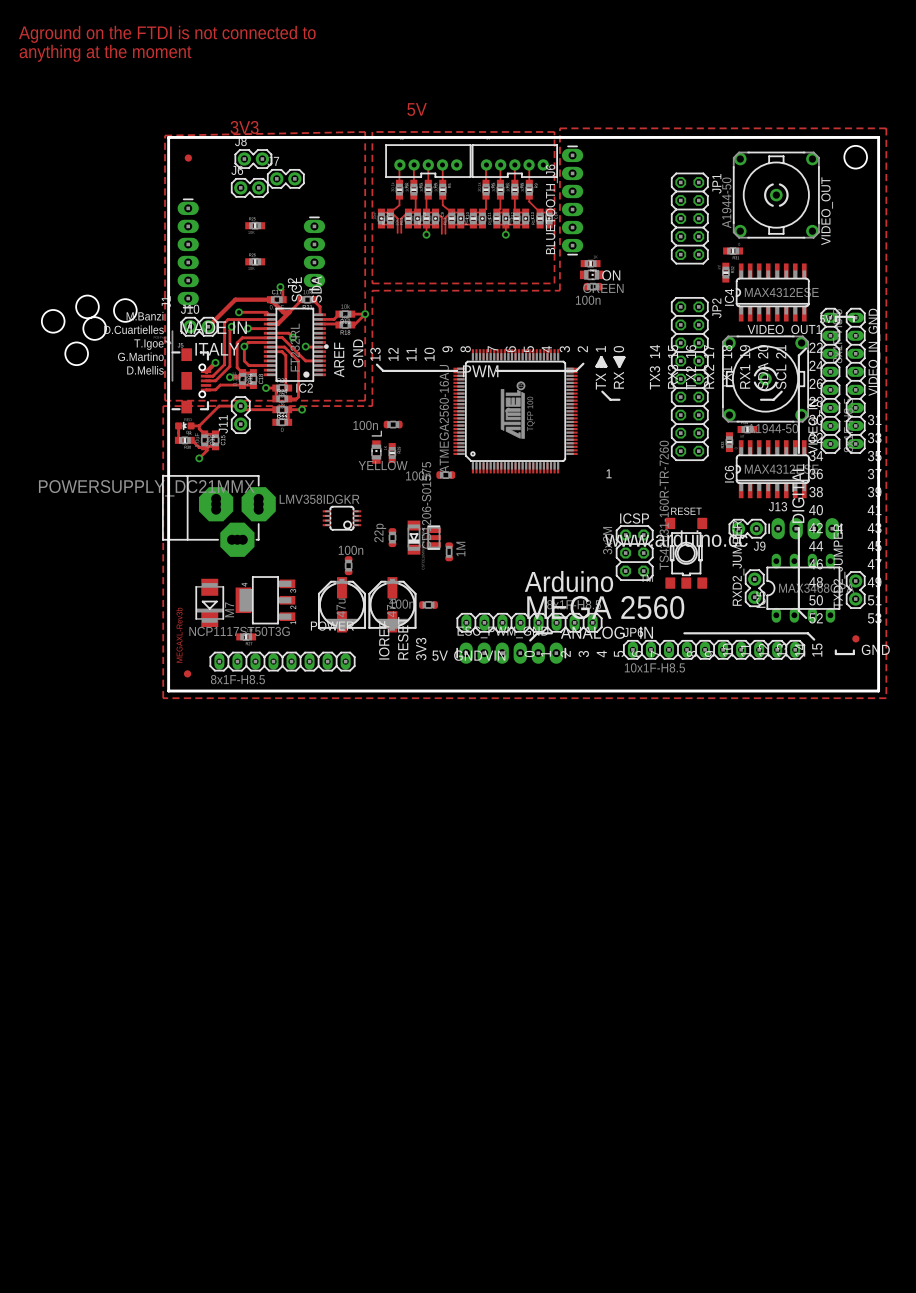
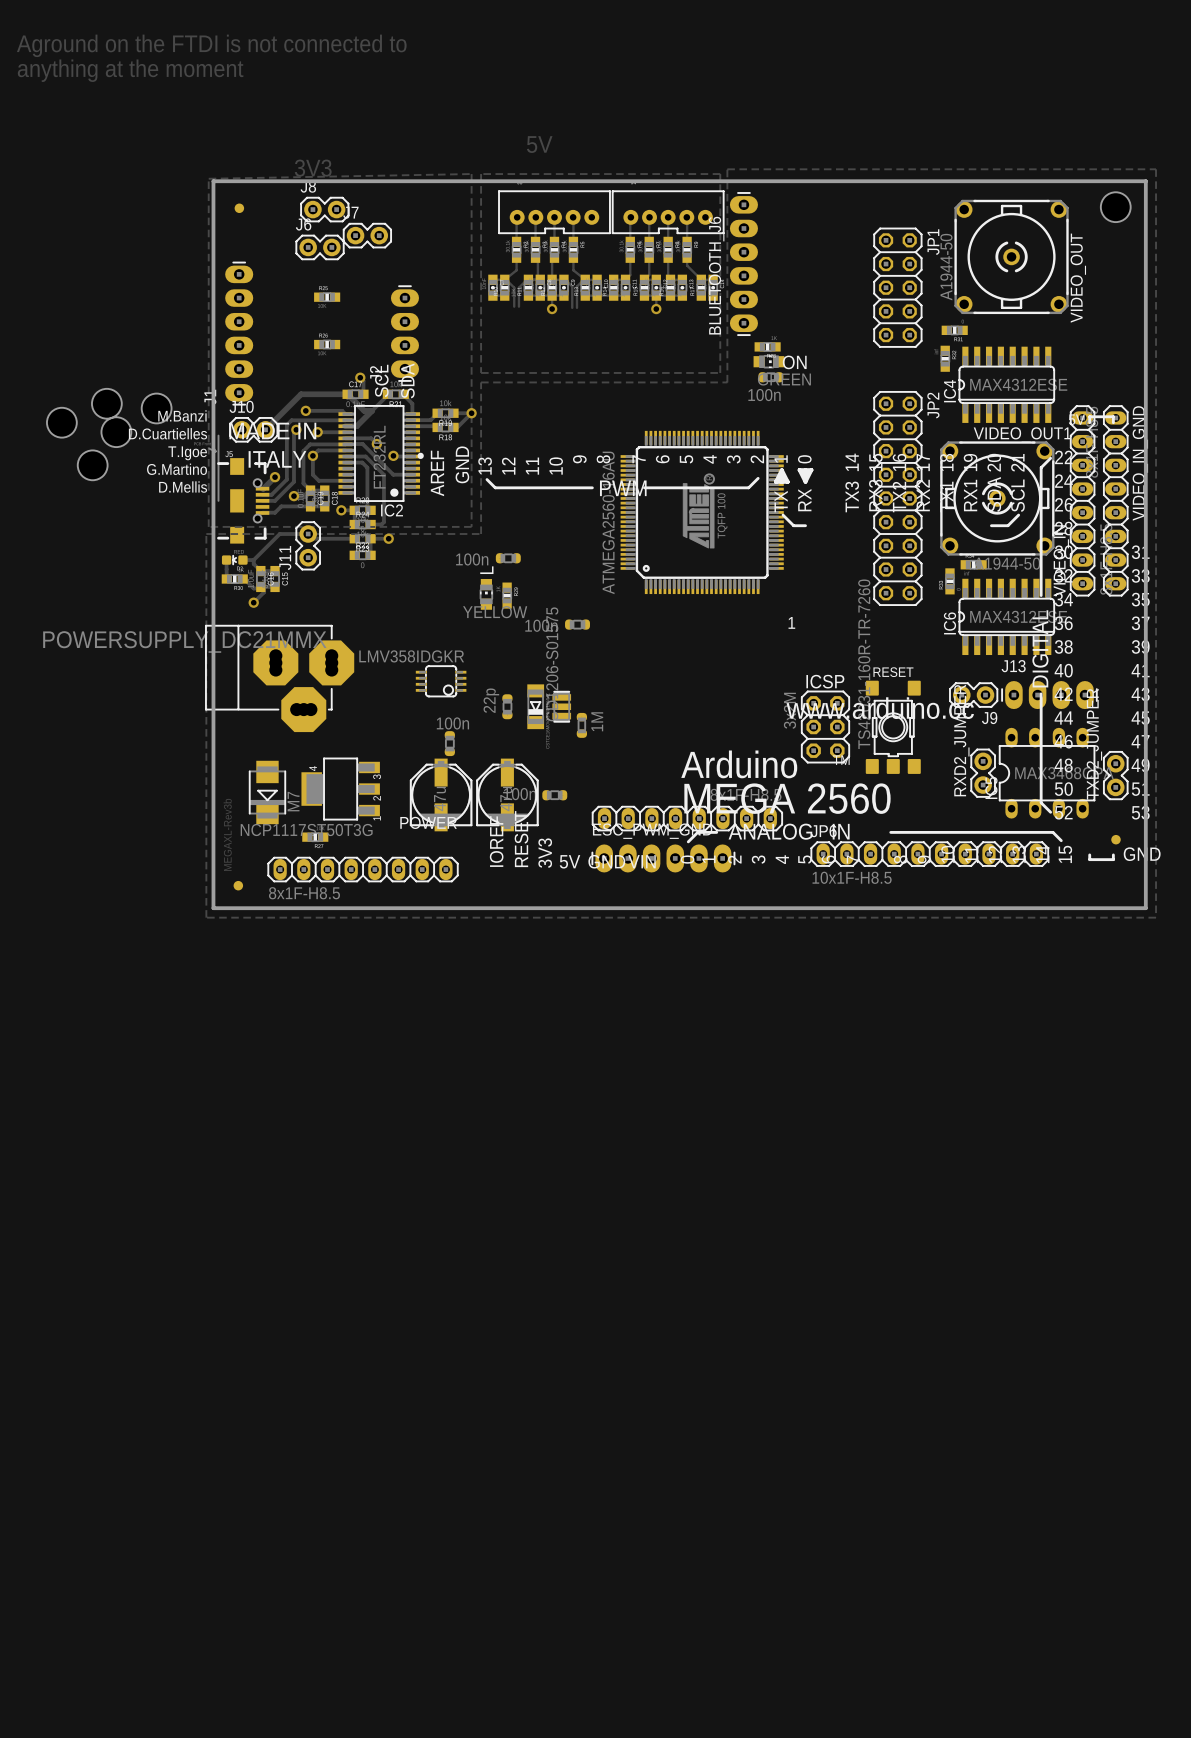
part position: (515, 411) -> (702, 512)

